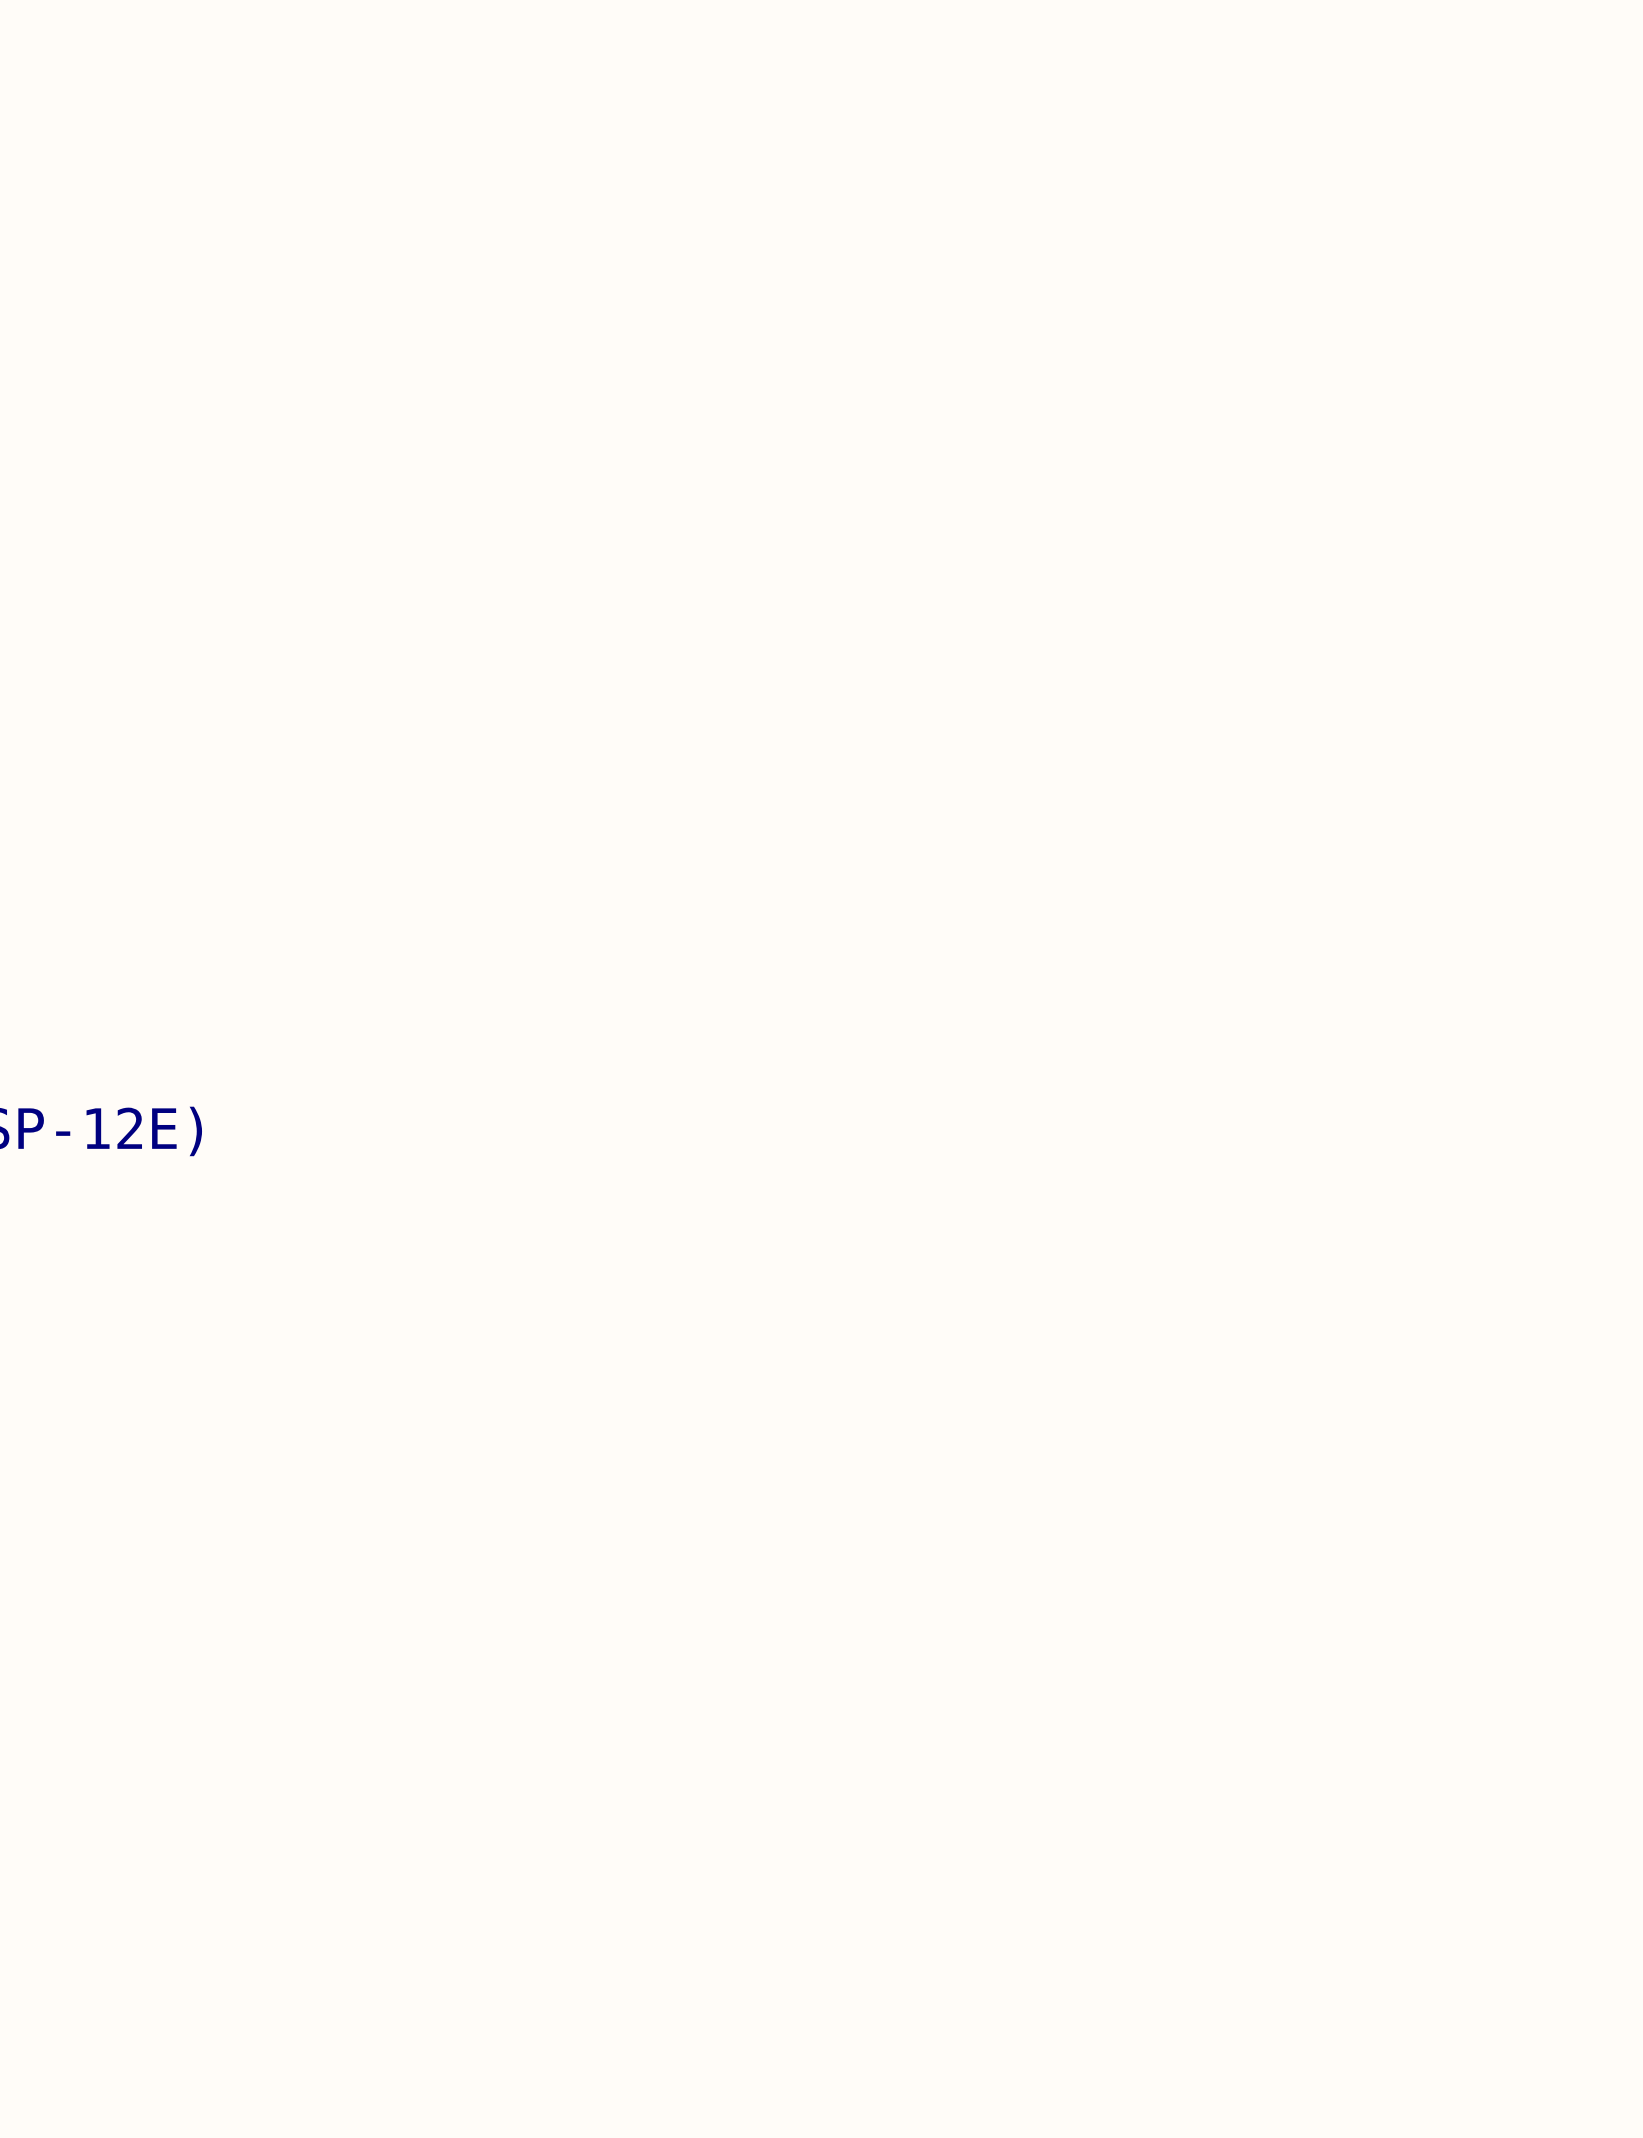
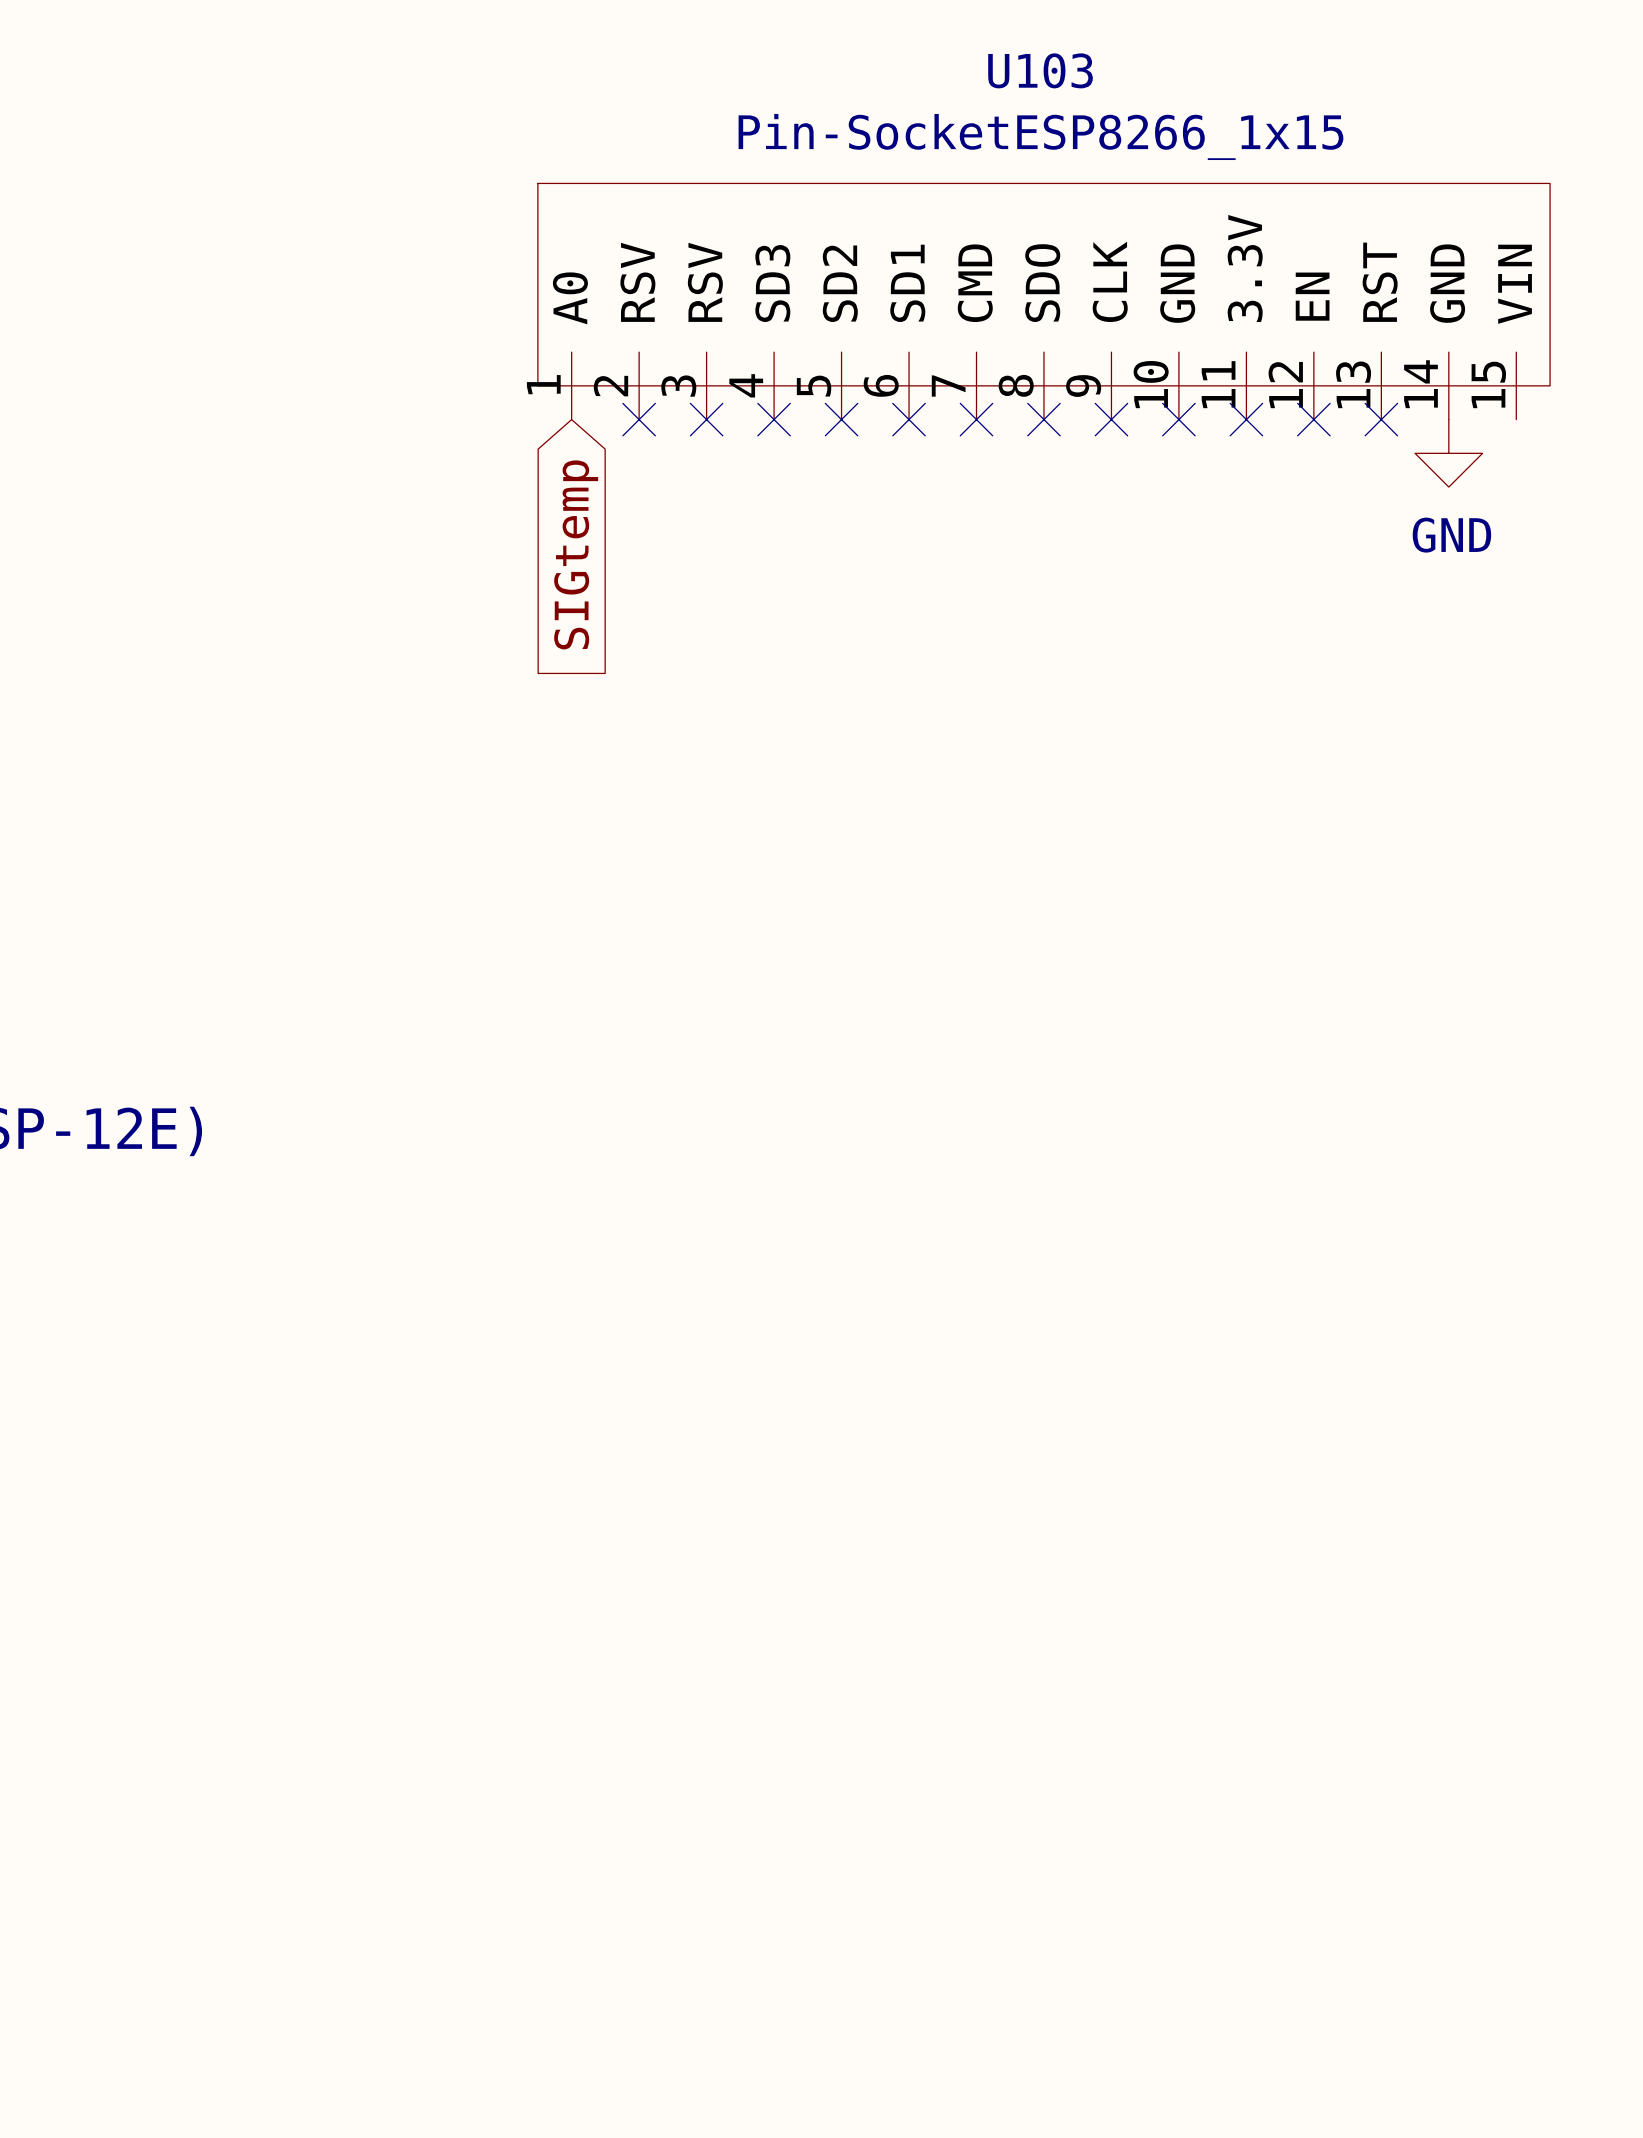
U103: none -> Pin-SocketESP8266_1x15 (1043, 301)
no-connect mark: none -> (639, 419)
no-connect mark: none -> (706, 419)
no-connect mark: none -> (774, 419)
no-connect mark: none -> (841, 419)
no-connect mark: none -> (909, 419)
no-connect mark: none -> (976, 419)
no-connect mark: none -> (1043, 419)
no-connect mark: none -> (1111, 419)
no-connect mark: none -> (1178, 419)
no-connect mark: none -> (1246, 419)
no-connect mark: none -> (1313, 419)
no-connect mark: none -> (1381, 419)
power symbol: none -> GND (1448, 453)
global label: none -> SIGtemp (576, 554)

